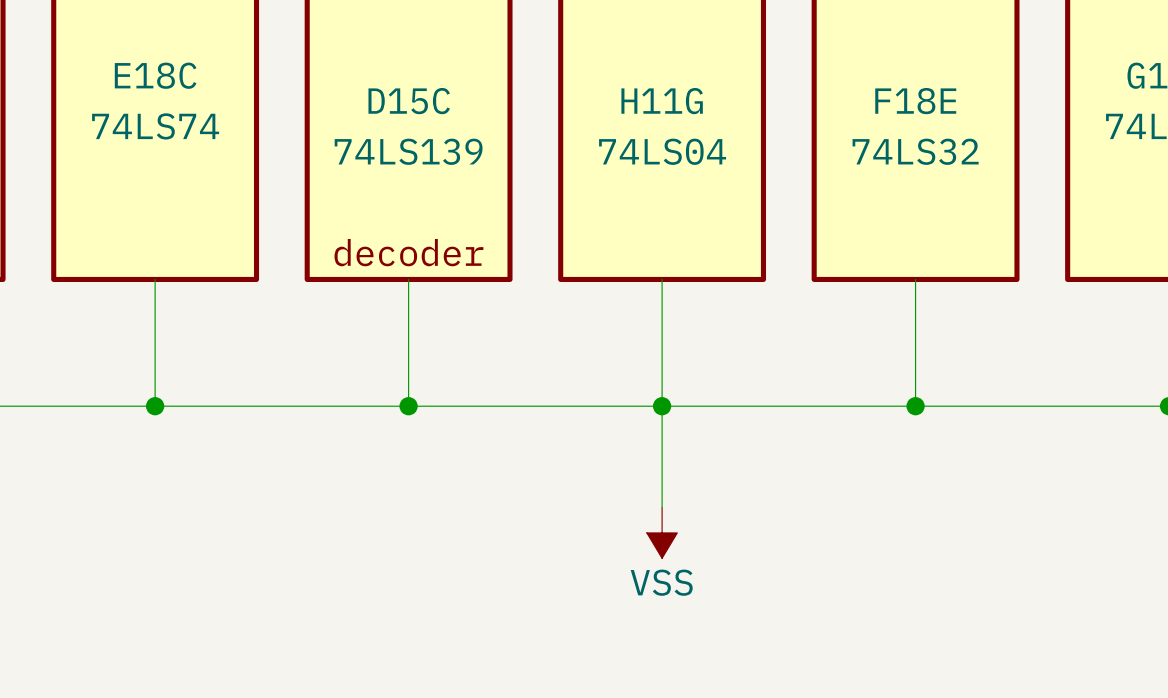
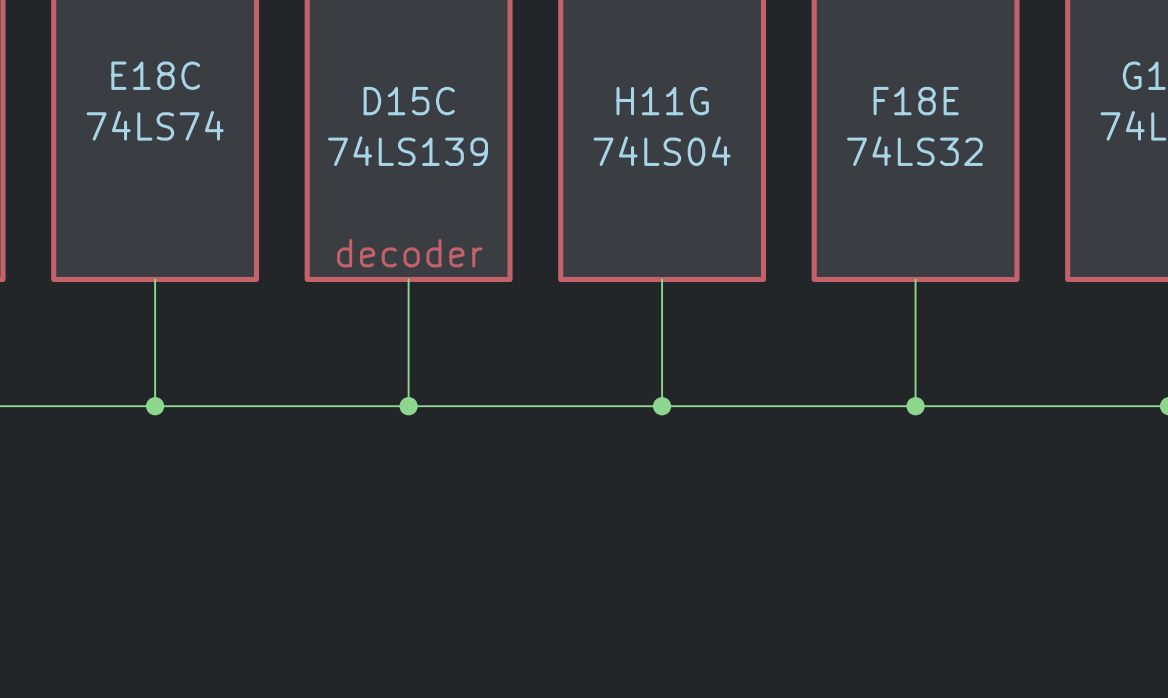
wire: (662, 406) (662, 507) -> none
power symbol: VSS (662, 532) -> none

